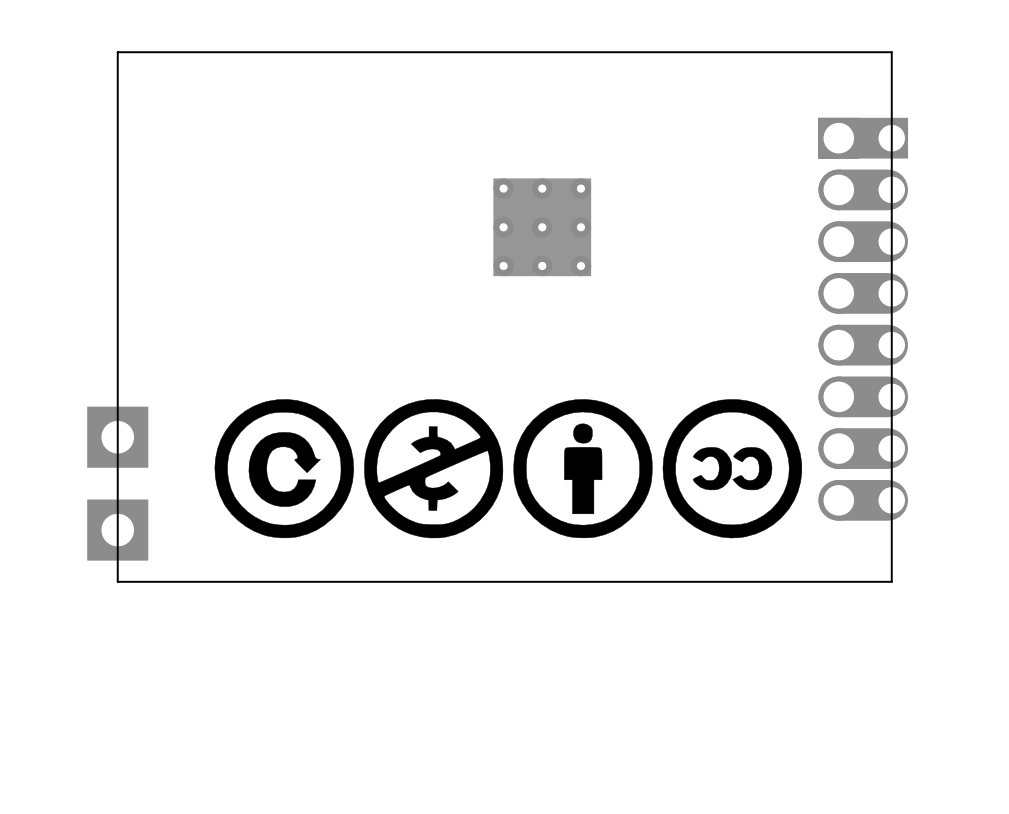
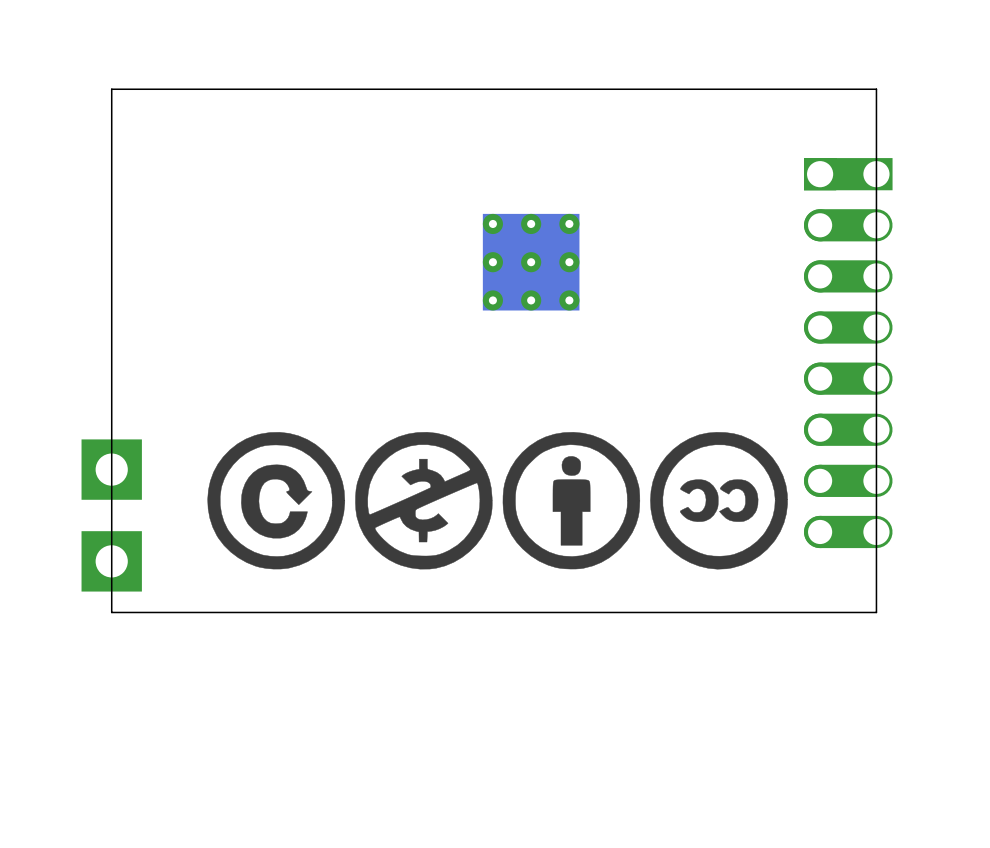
part footprint: [818, 117, 909, 159] -> [804, 158, 893, 191]
part footprint: [818, 169, 909, 211] -> [804, 209, 893, 242]
part footprint: [818, 221, 909, 263] -> [804, 260, 893, 293]
part footprint: [818, 273, 909, 314] -> [804, 311, 893, 344]
part footprint: [818, 324, 909, 366] -> [804, 362, 893, 395]
part footprint: [818, 376, 909, 418] -> [804, 413, 893, 446]
part footprint: [818, 428, 909, 469] -> [804, 464, 893, 497]
part footprint: [818, 479, 909, 521] -> [804, 515, 893, 549]

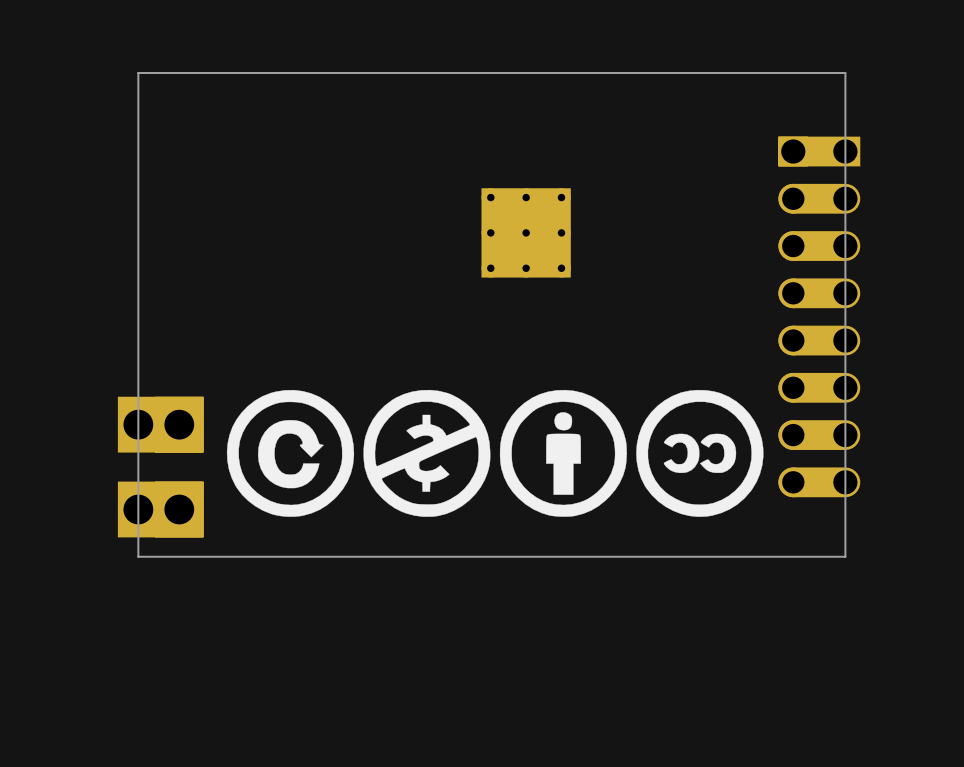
part footprint: [81, 439, 142, 500] -> [117, 396, 204, 453]
part footprint: [81, 531, 142, 592] -> [117, 481, 204, 538]

